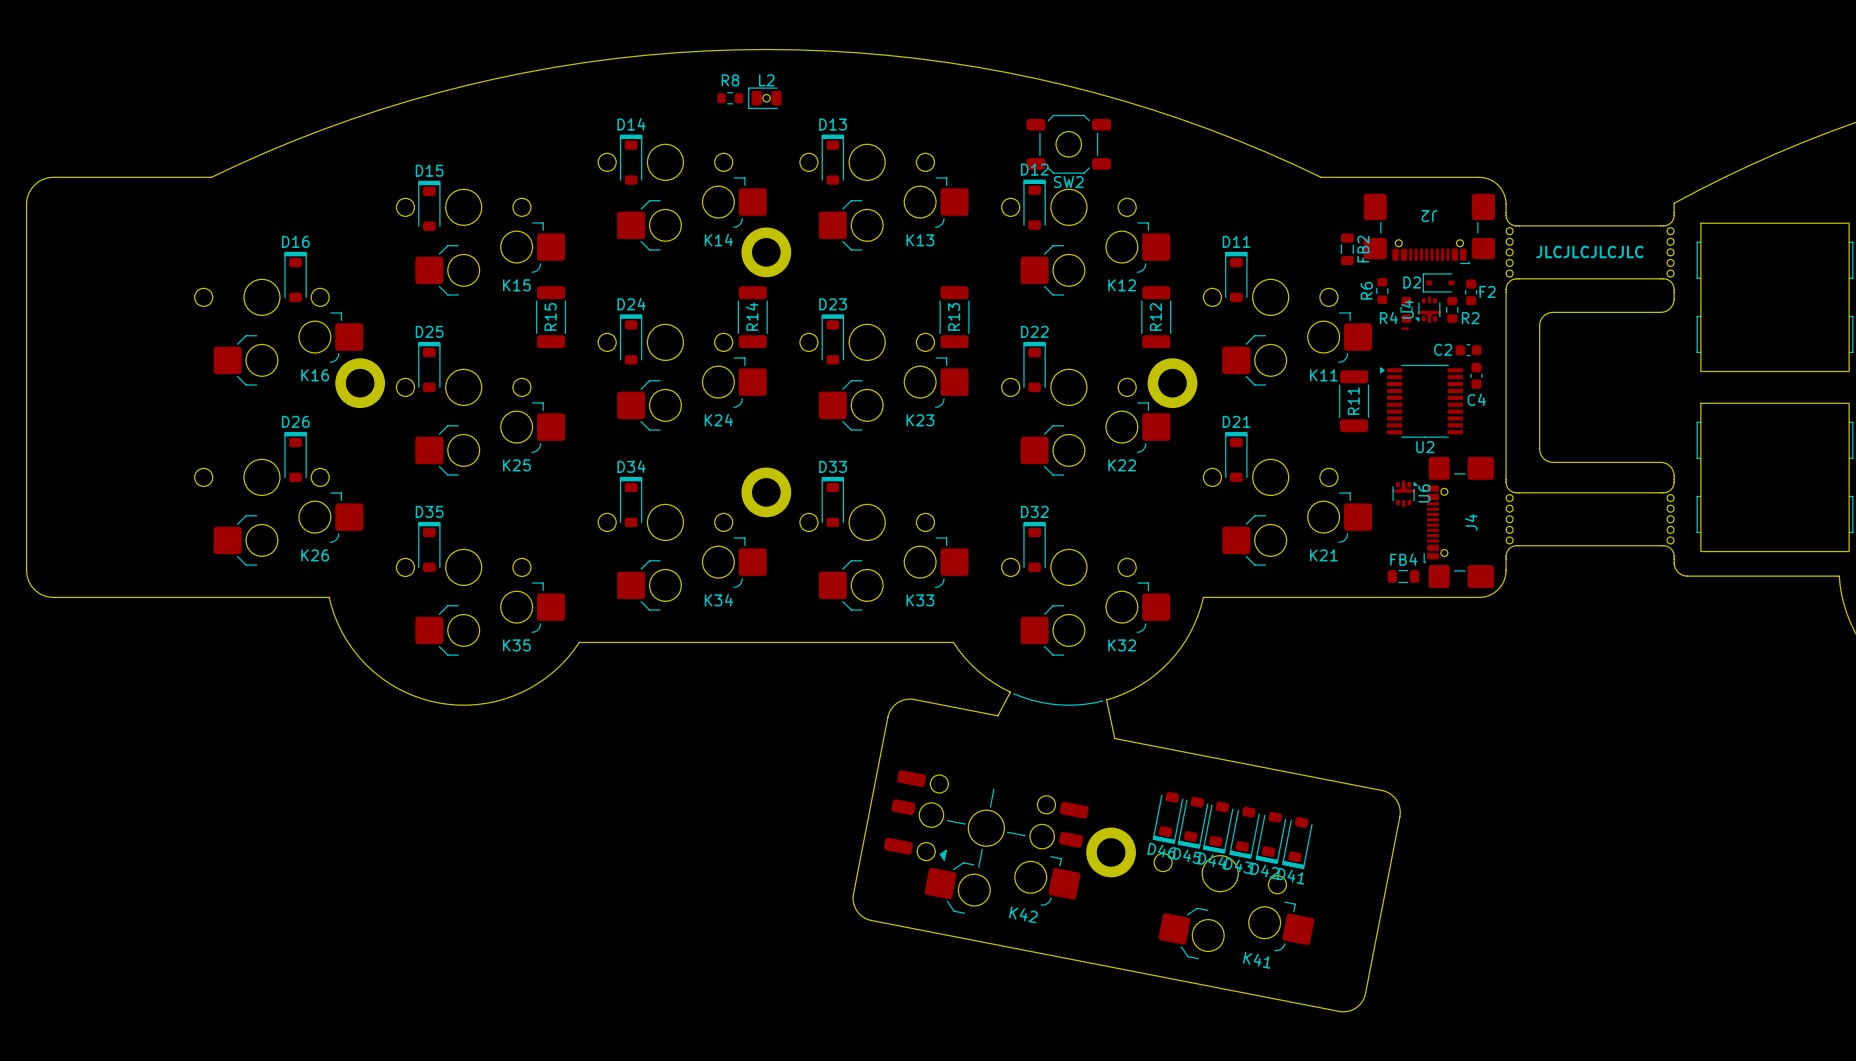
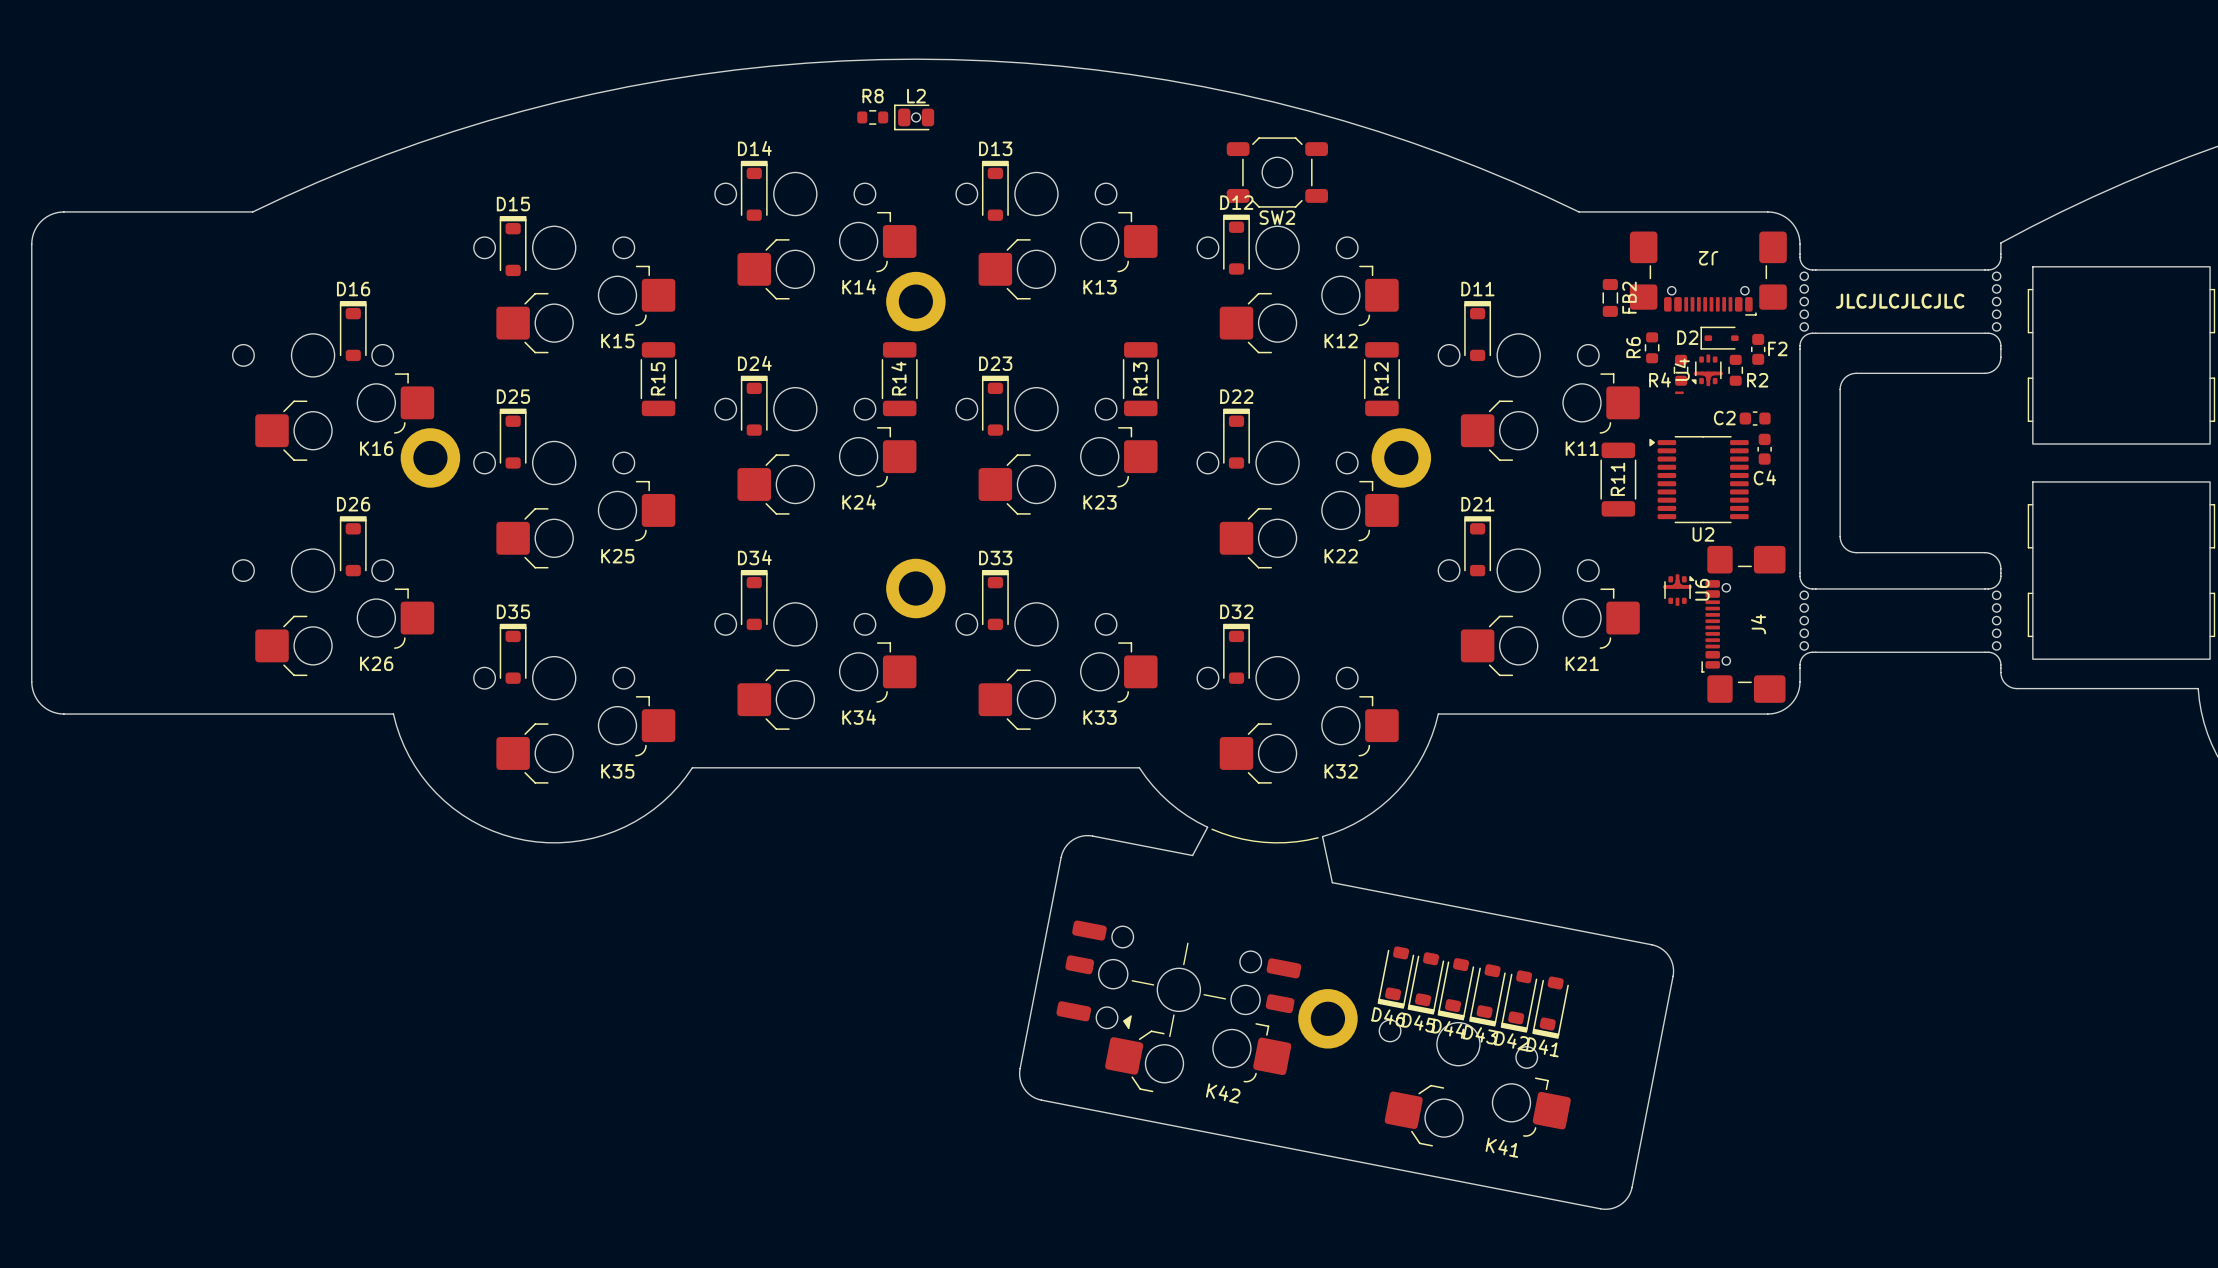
FB4: (1403, 576) -> none

